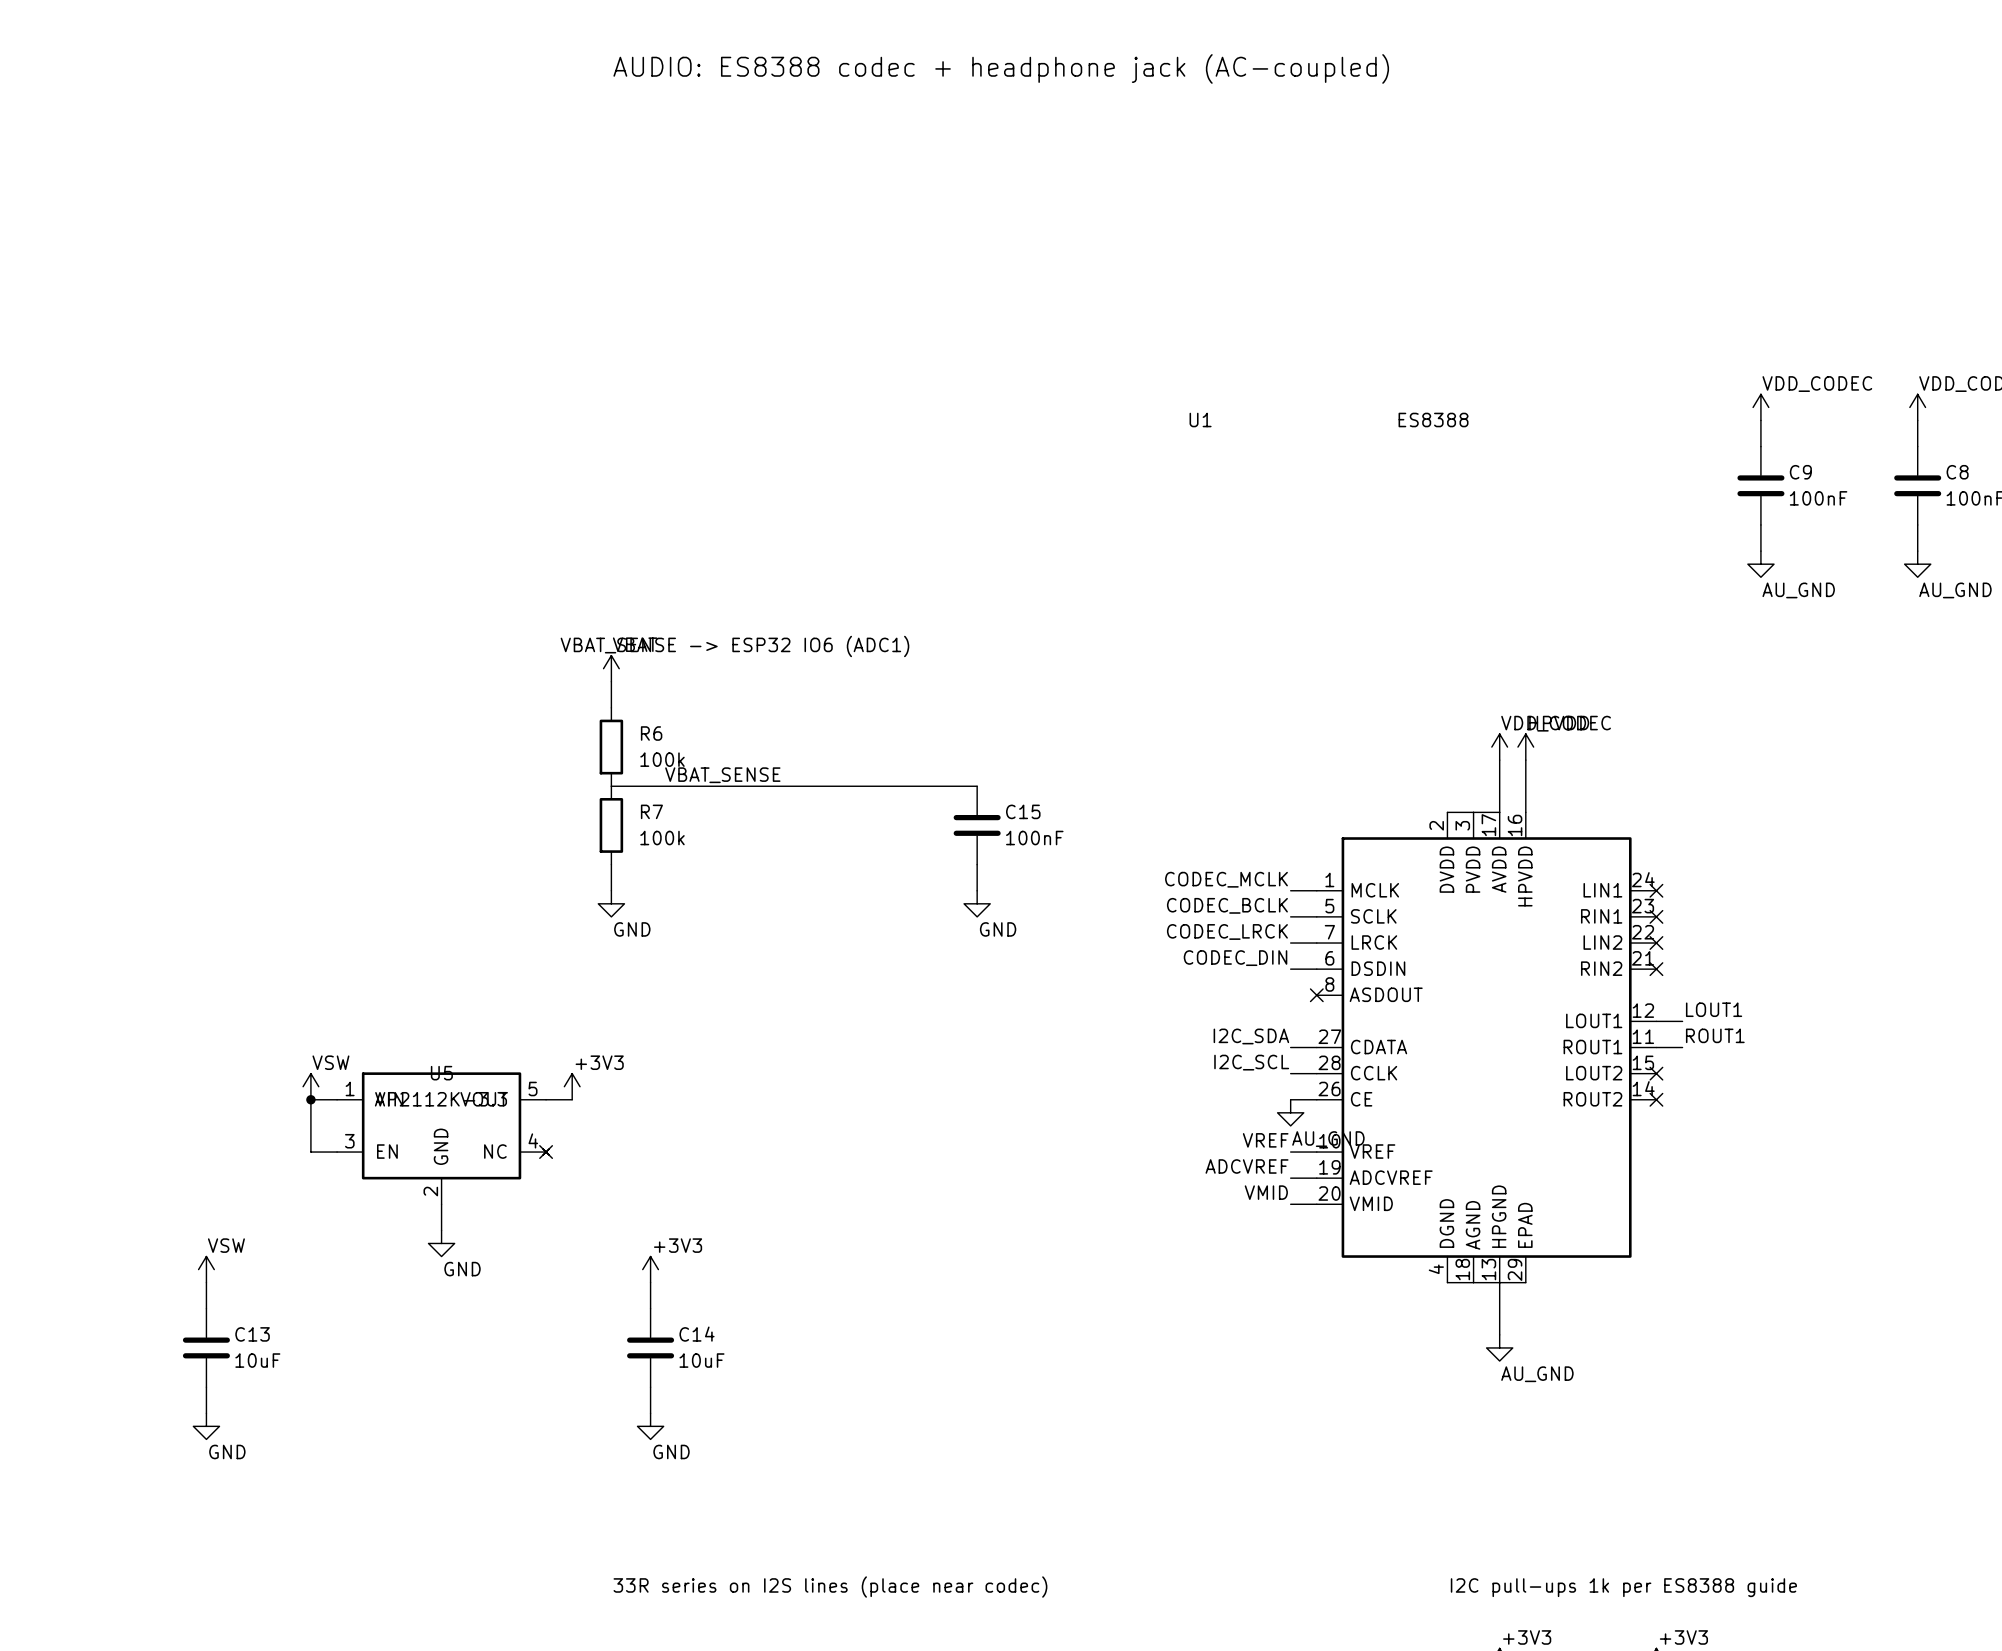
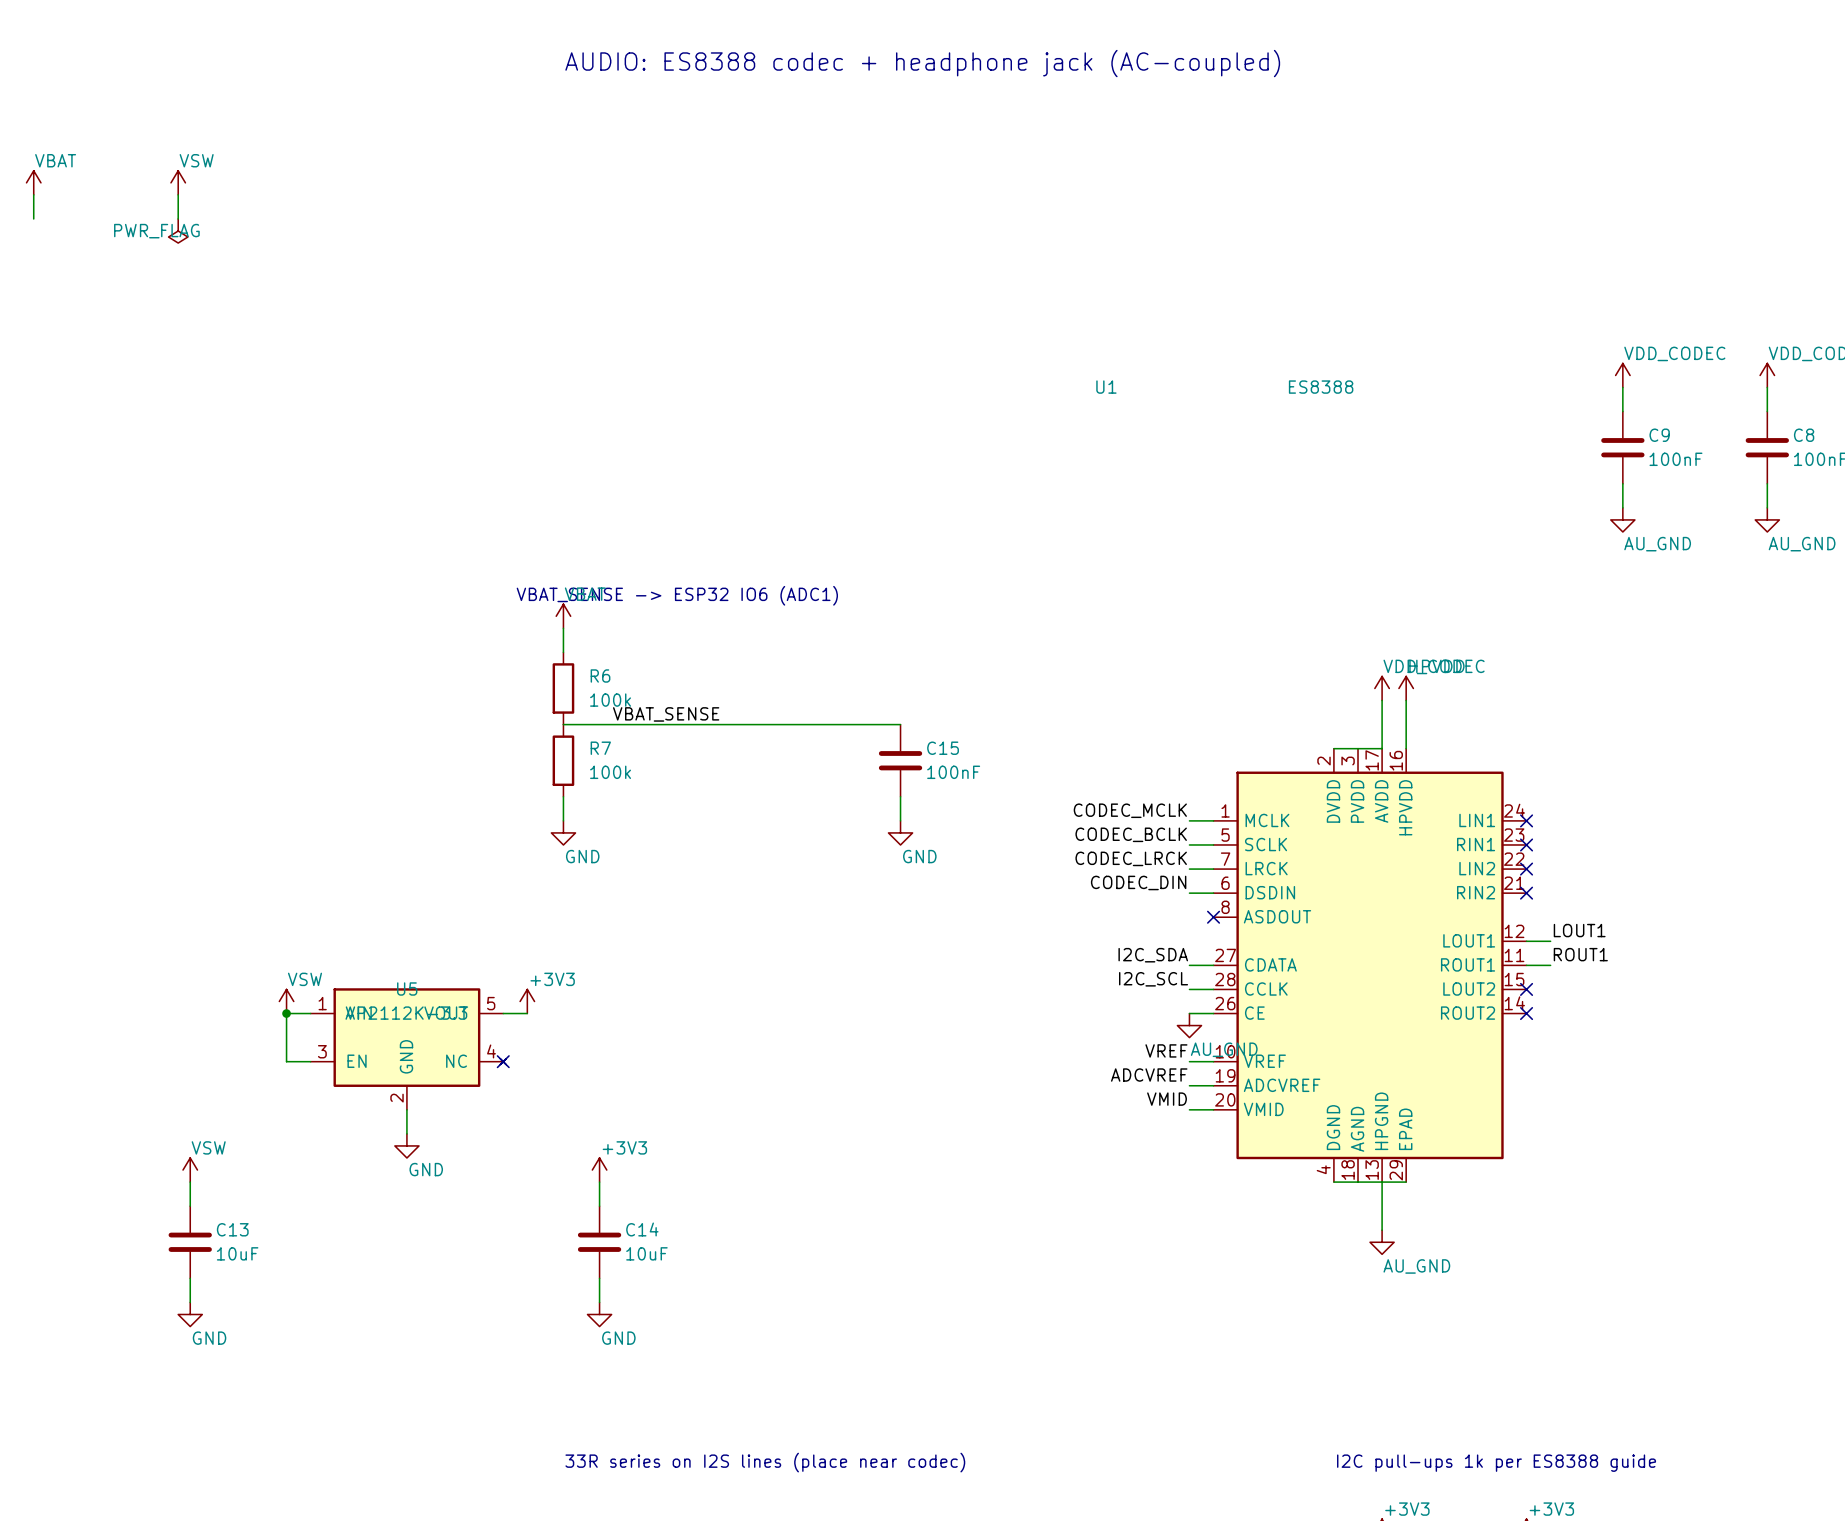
power symbol: none -> VBAT (33, 182)
power symbol: none -> VSW (178, 182)
wire: none -> (33, 194) (33, 218)
wire: none -> (178, 194) (178, 218)
power symbol: none -> PWR_FLAG (178, 231)

